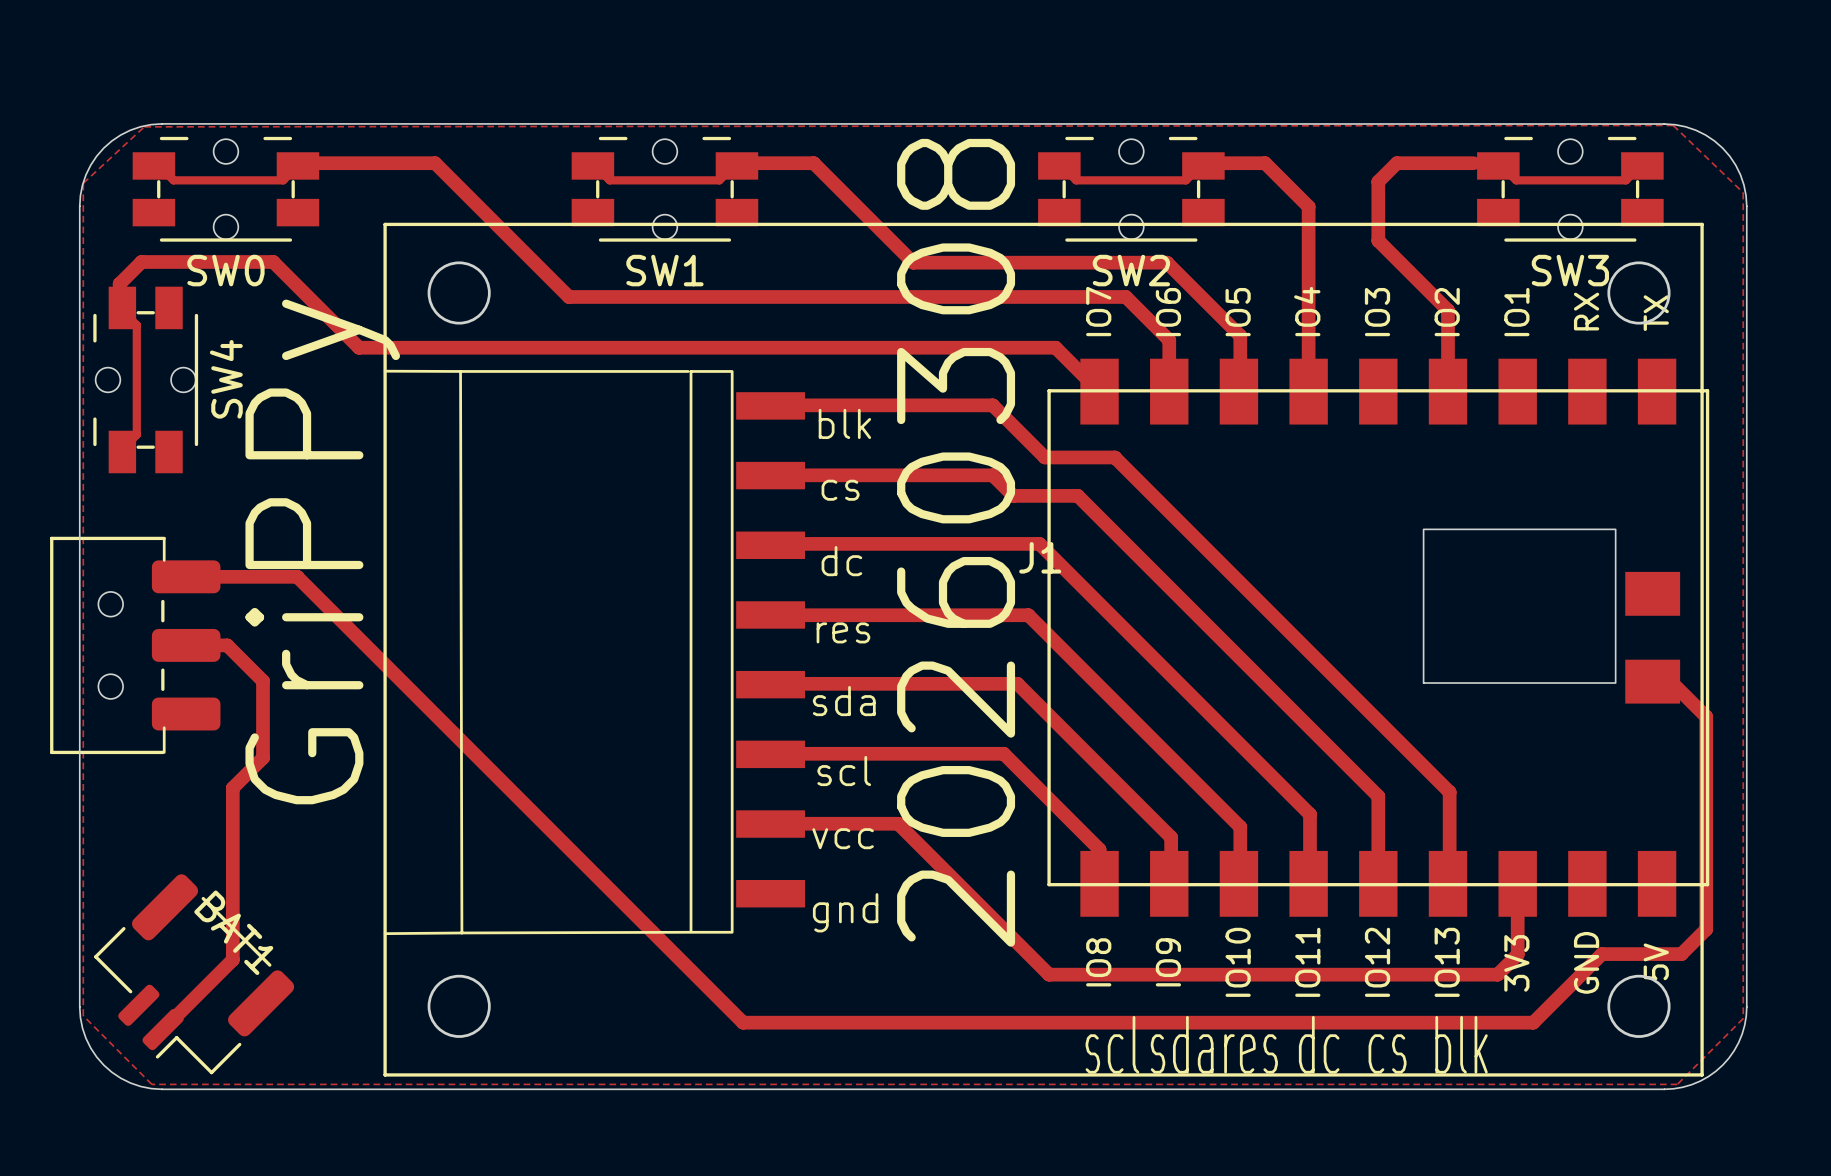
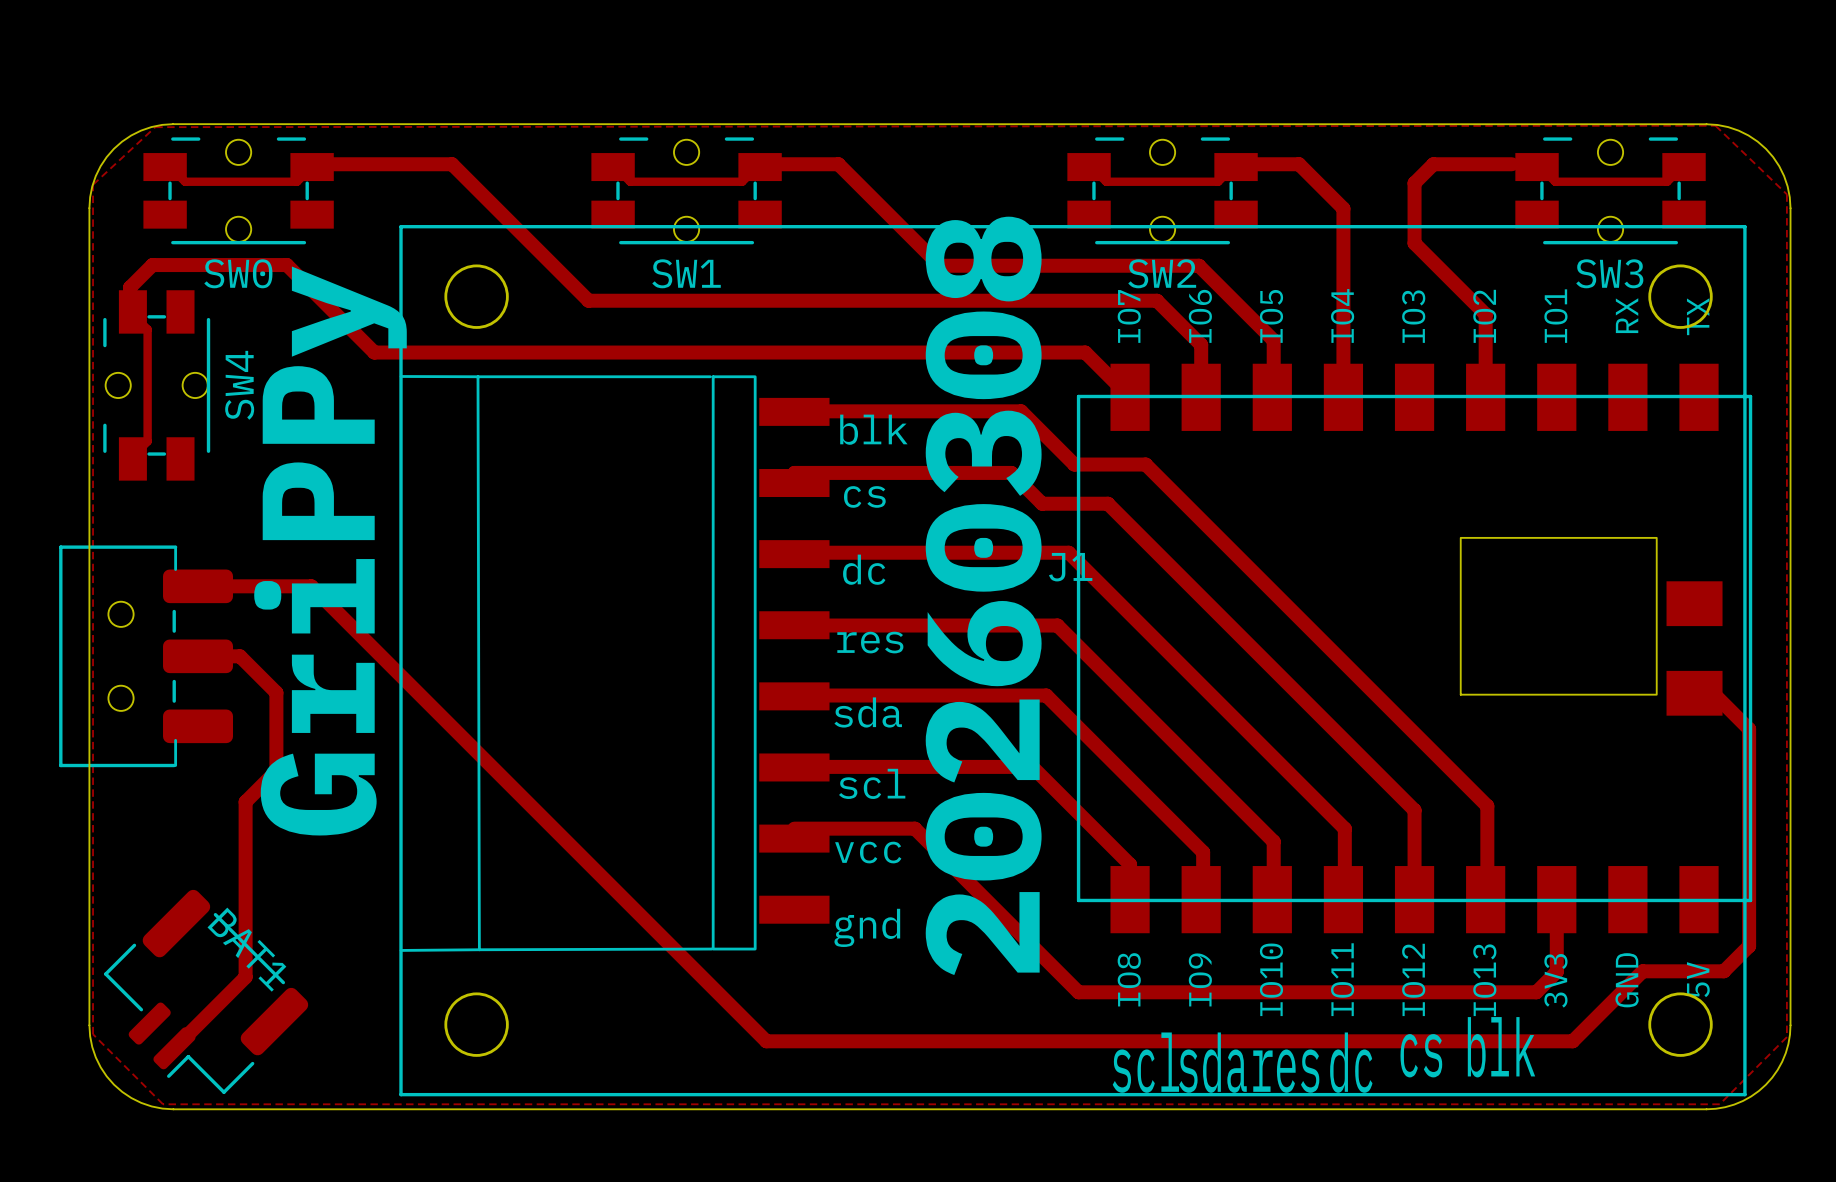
top track: (780, 475) (992, 475) -> (794, 472) (1011, 472) (1021, 482)
top track: (780, 823) (898, 823) -> (794, 828) (914, 828) (924, 838)
text position: blk (1461, 1044) -> blk (1501, 1047)
text position: cs (1387, 1053) -> cs (1421, 1055)

